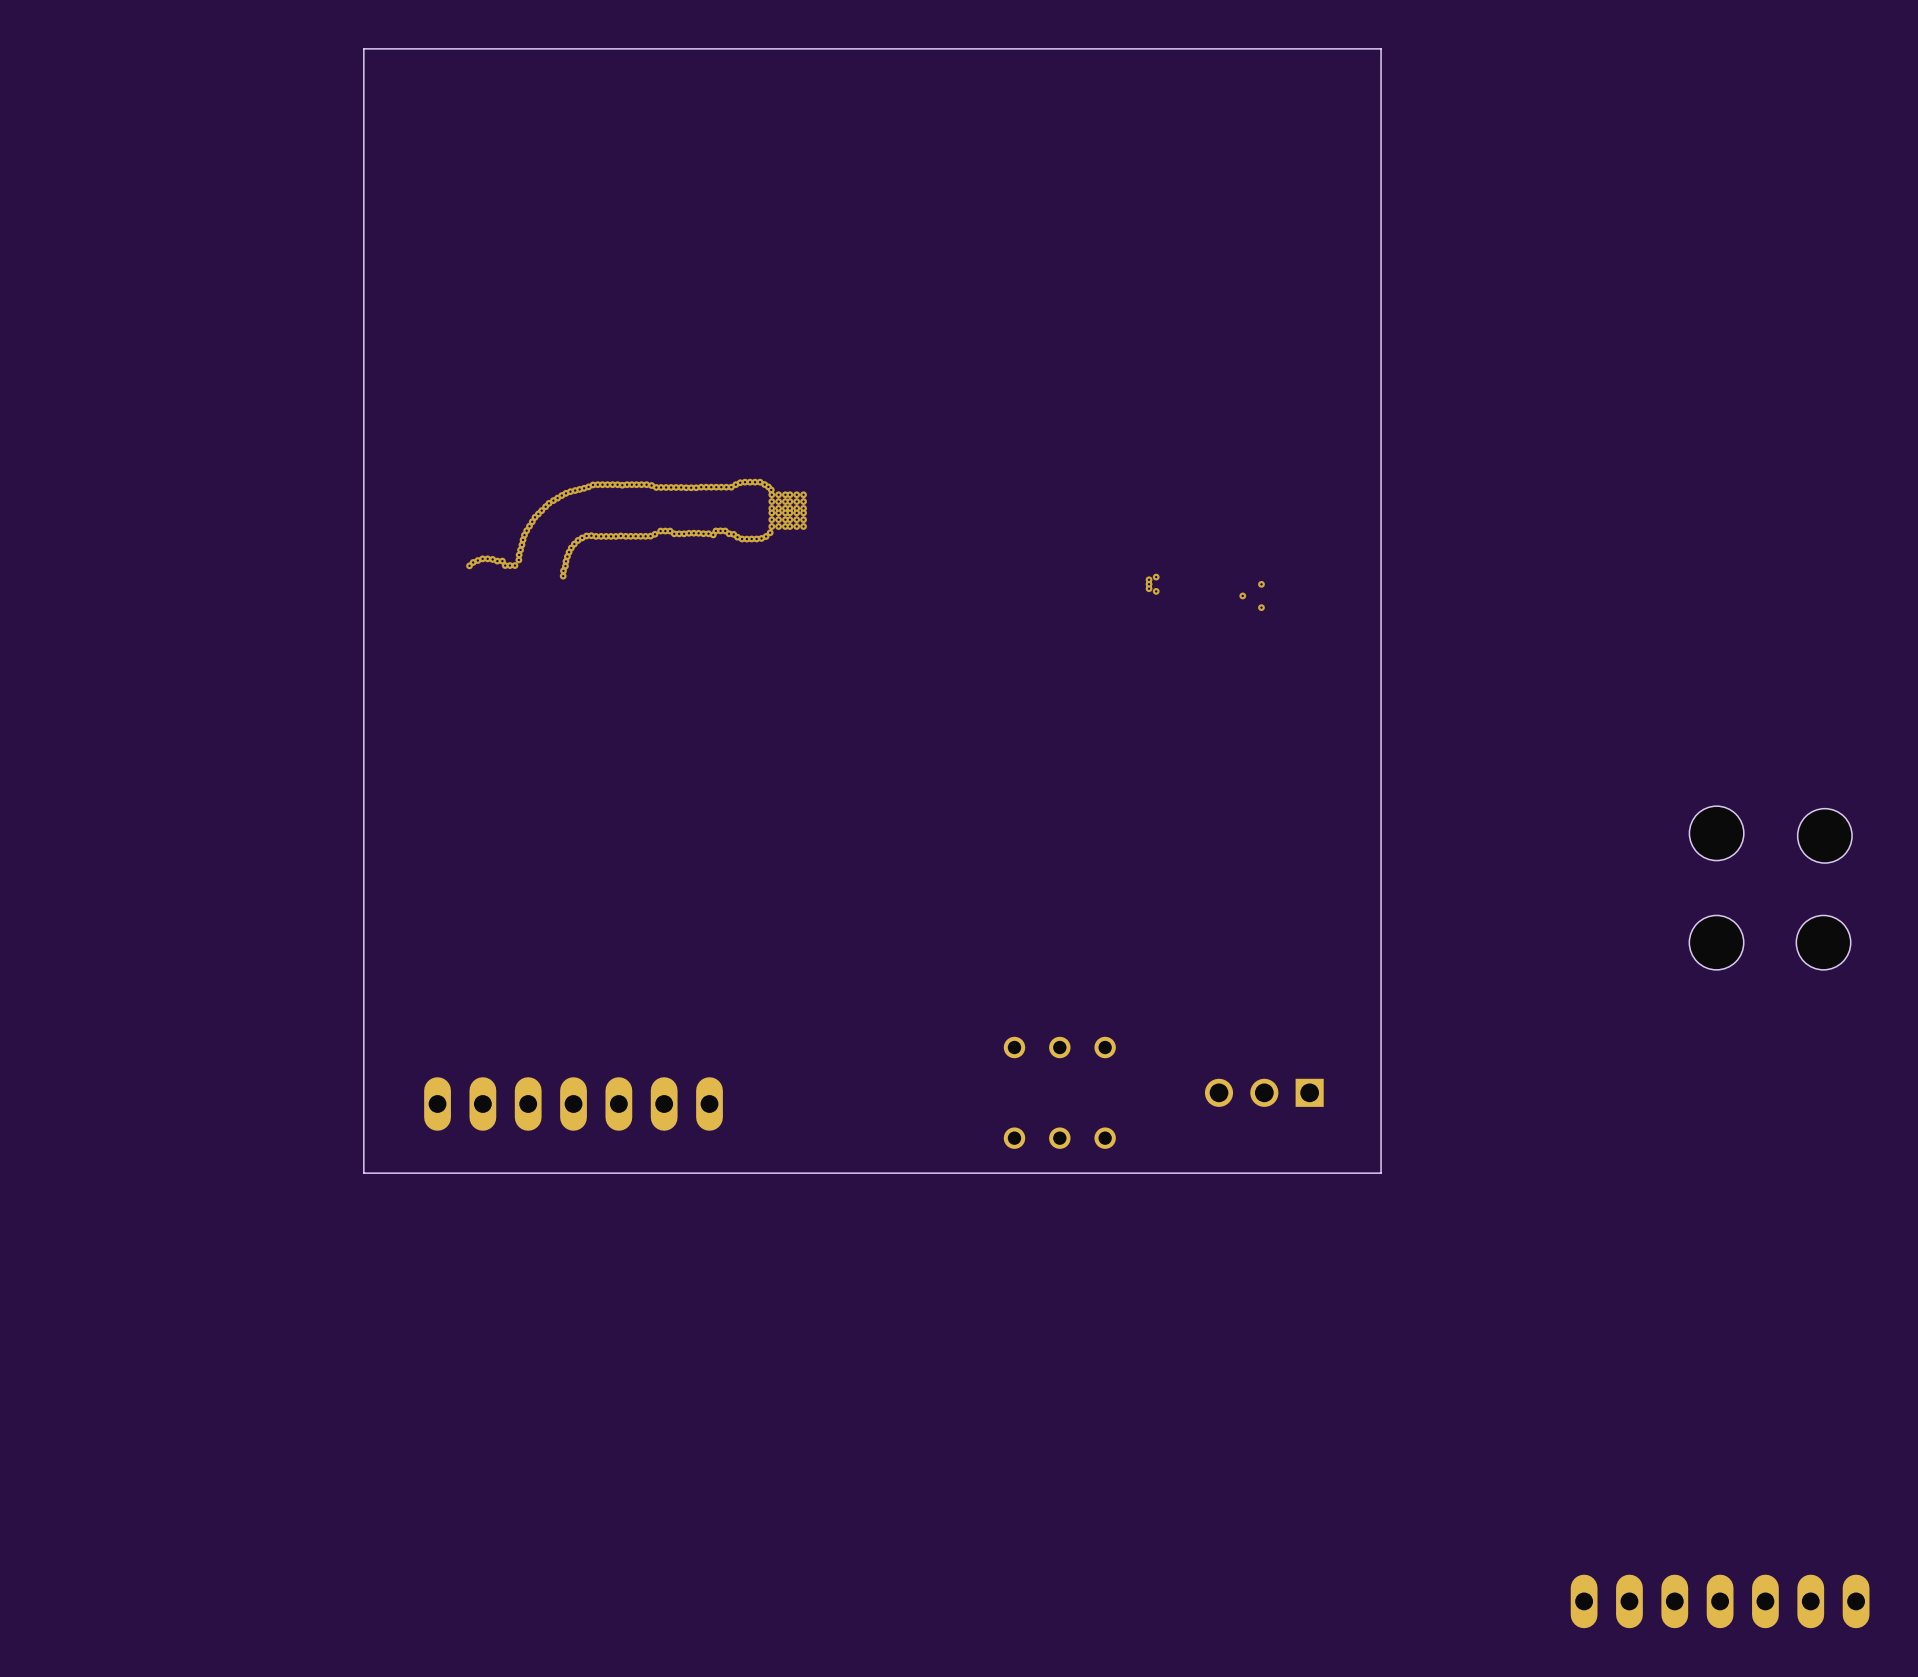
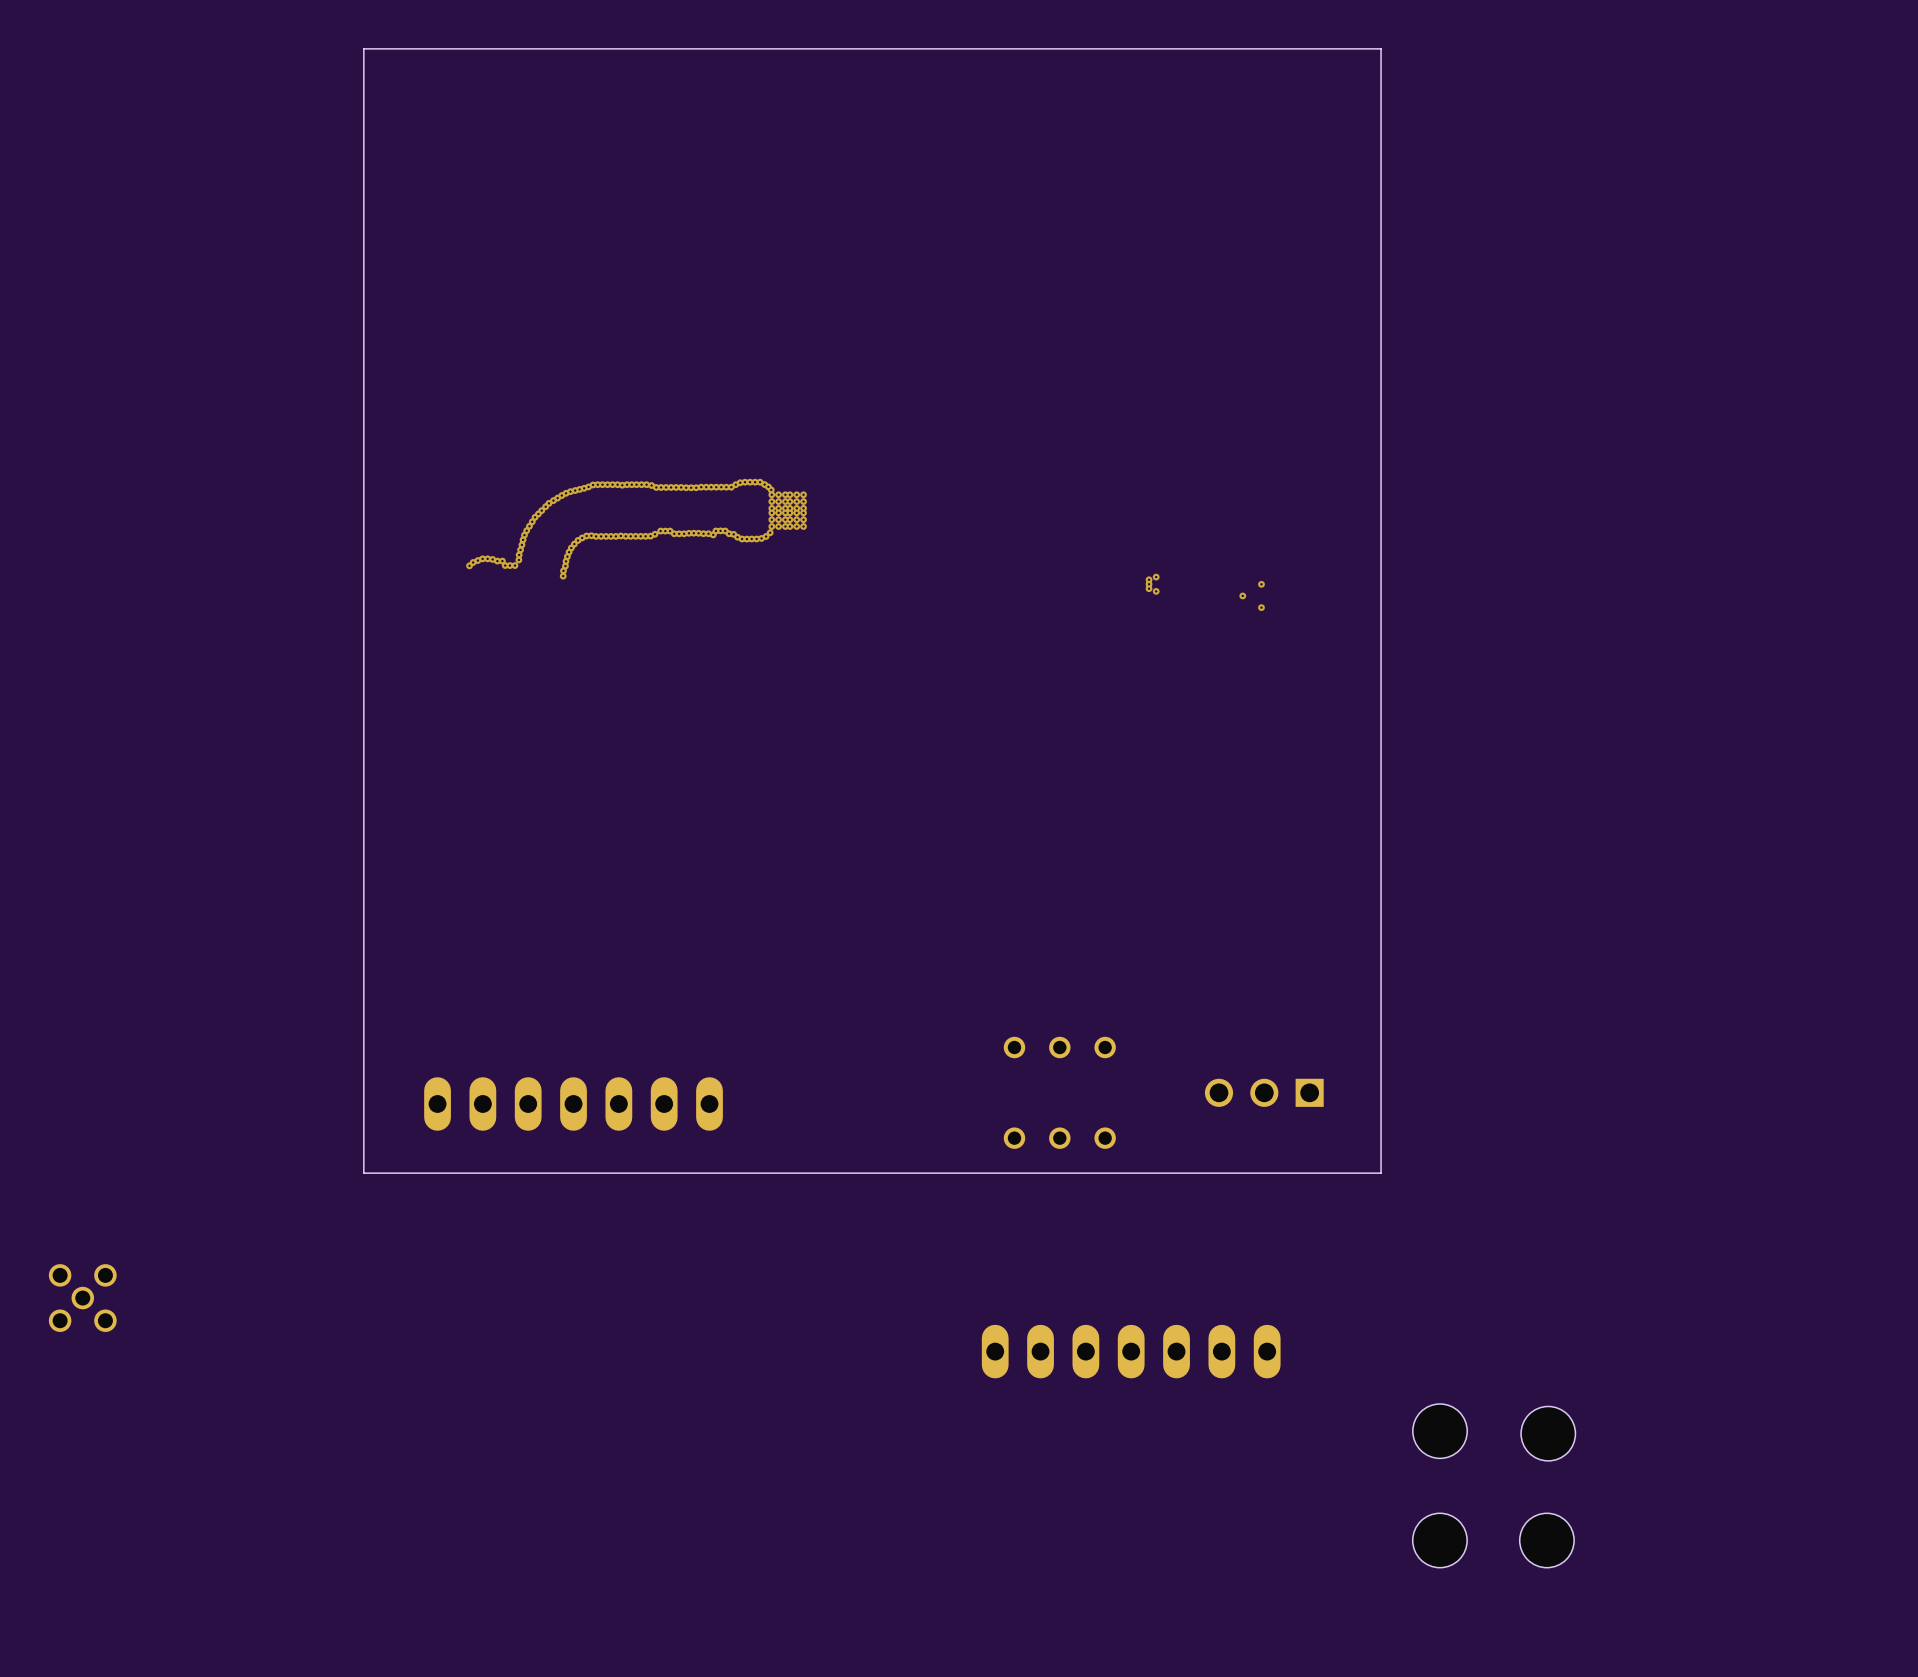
part: (1716, 833) -> none
part: (1824, 835) -> none
part: (1716, 942) -> none
part: (1823, 942) -> none
part: none -> (82, 1298)
part: none -> (1131, 1351)
part: none -> (1440, 1431)
part: none -> (1548, 1433)
part: none -> (1439, 1540)
part: none -> (1546, 1540)
part: (1720, 1601) -> none

